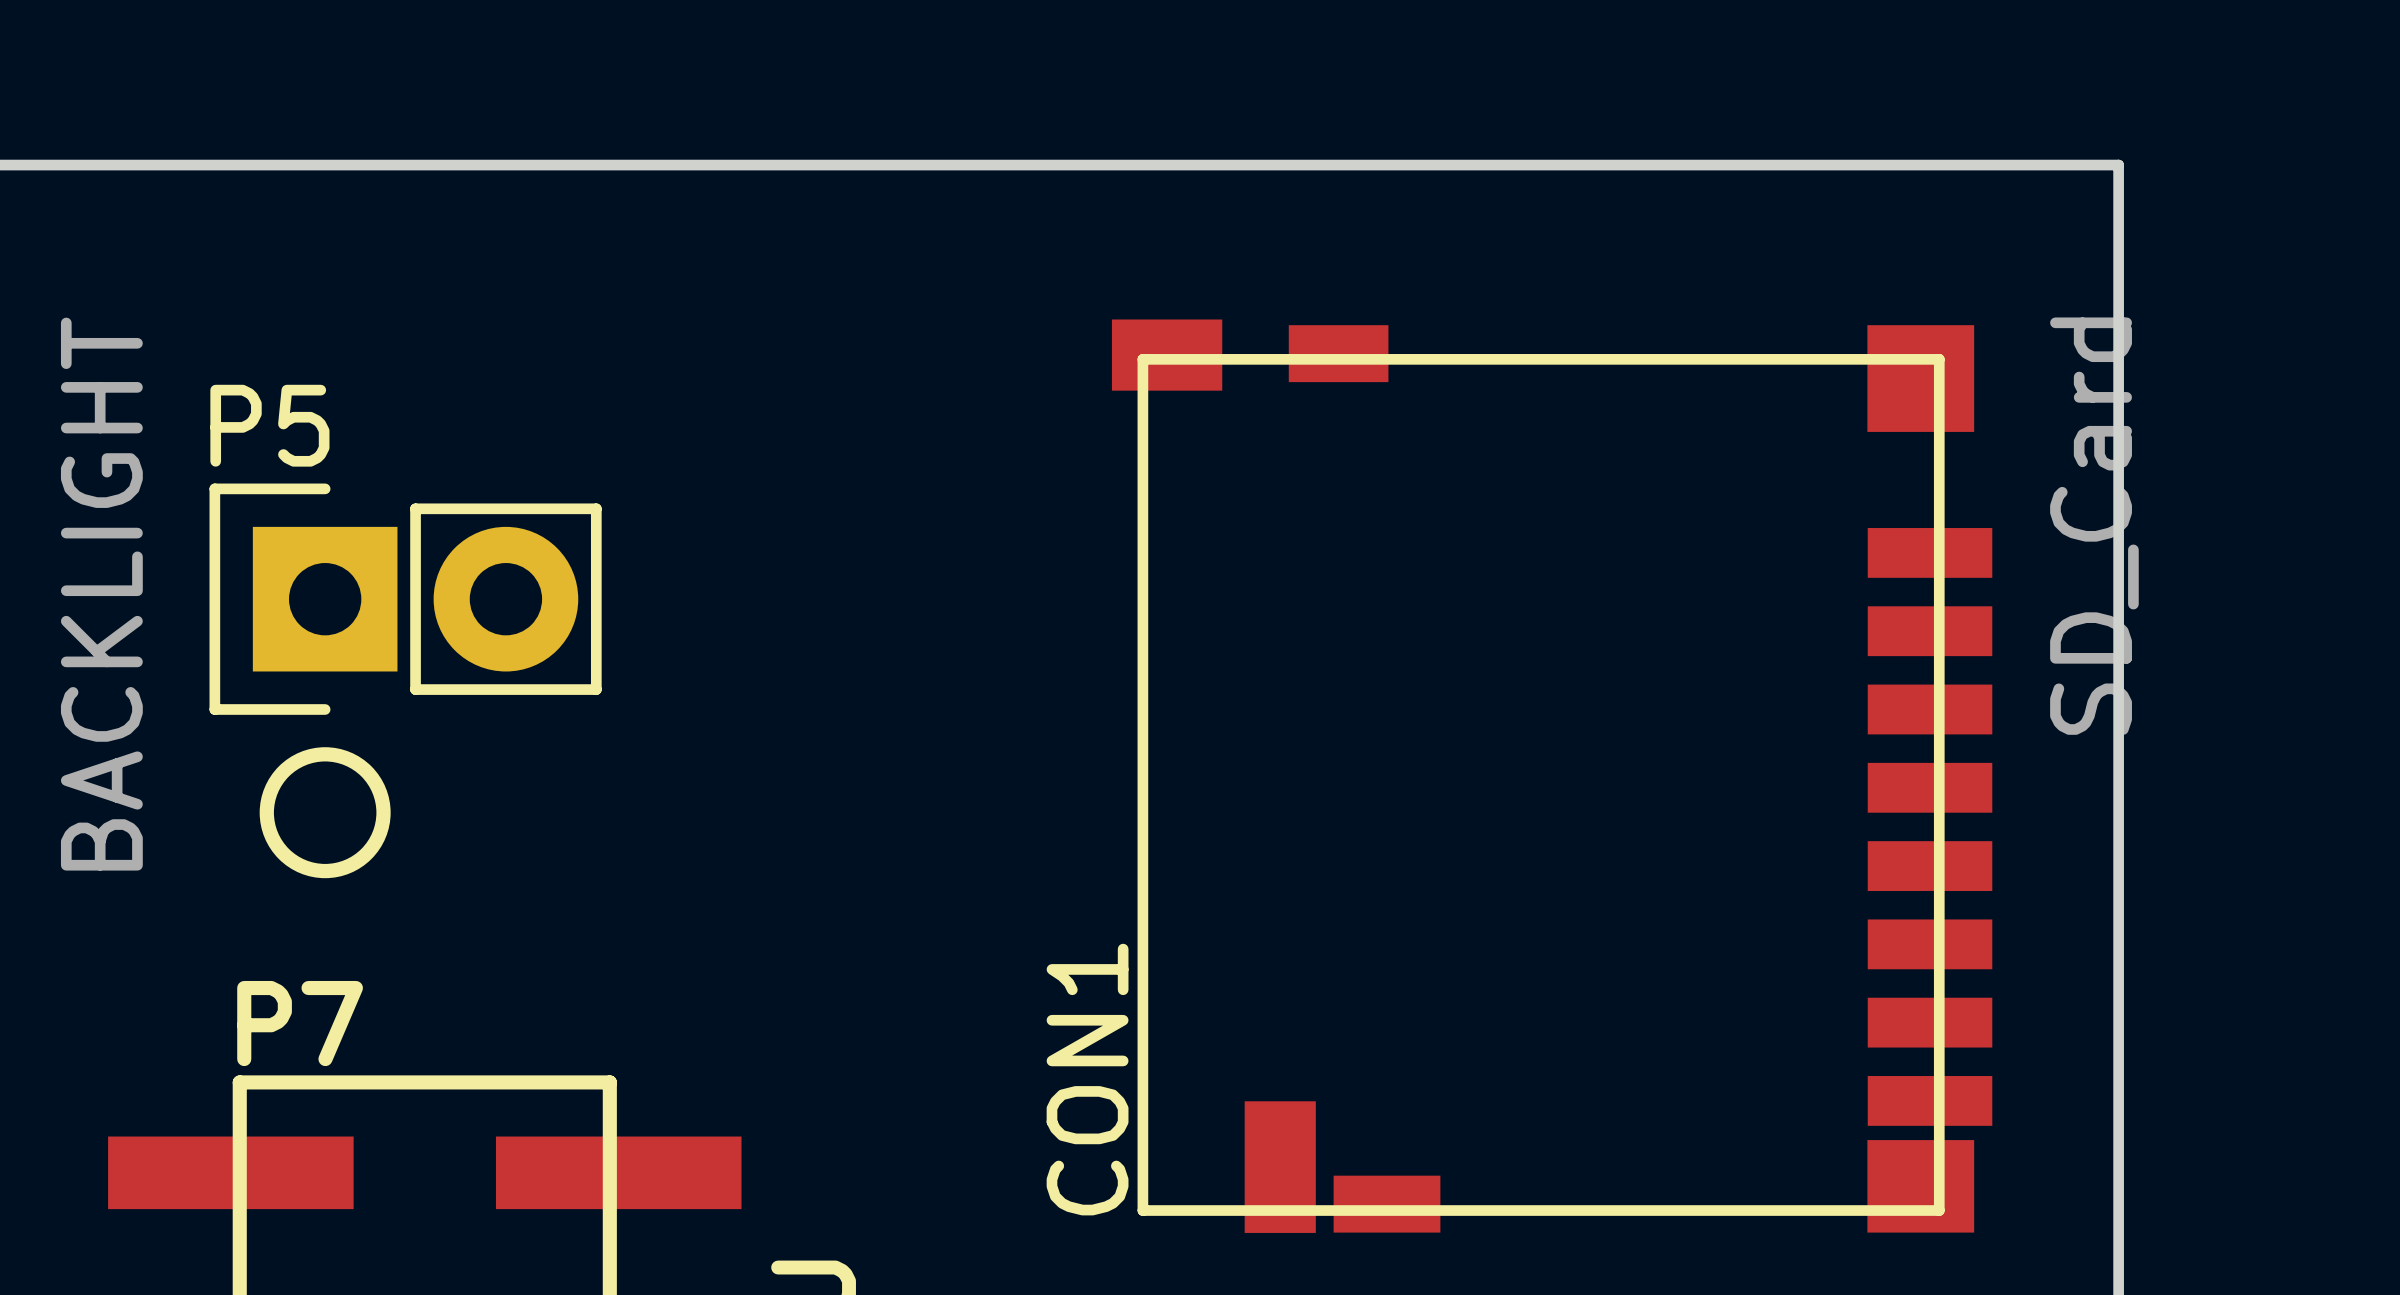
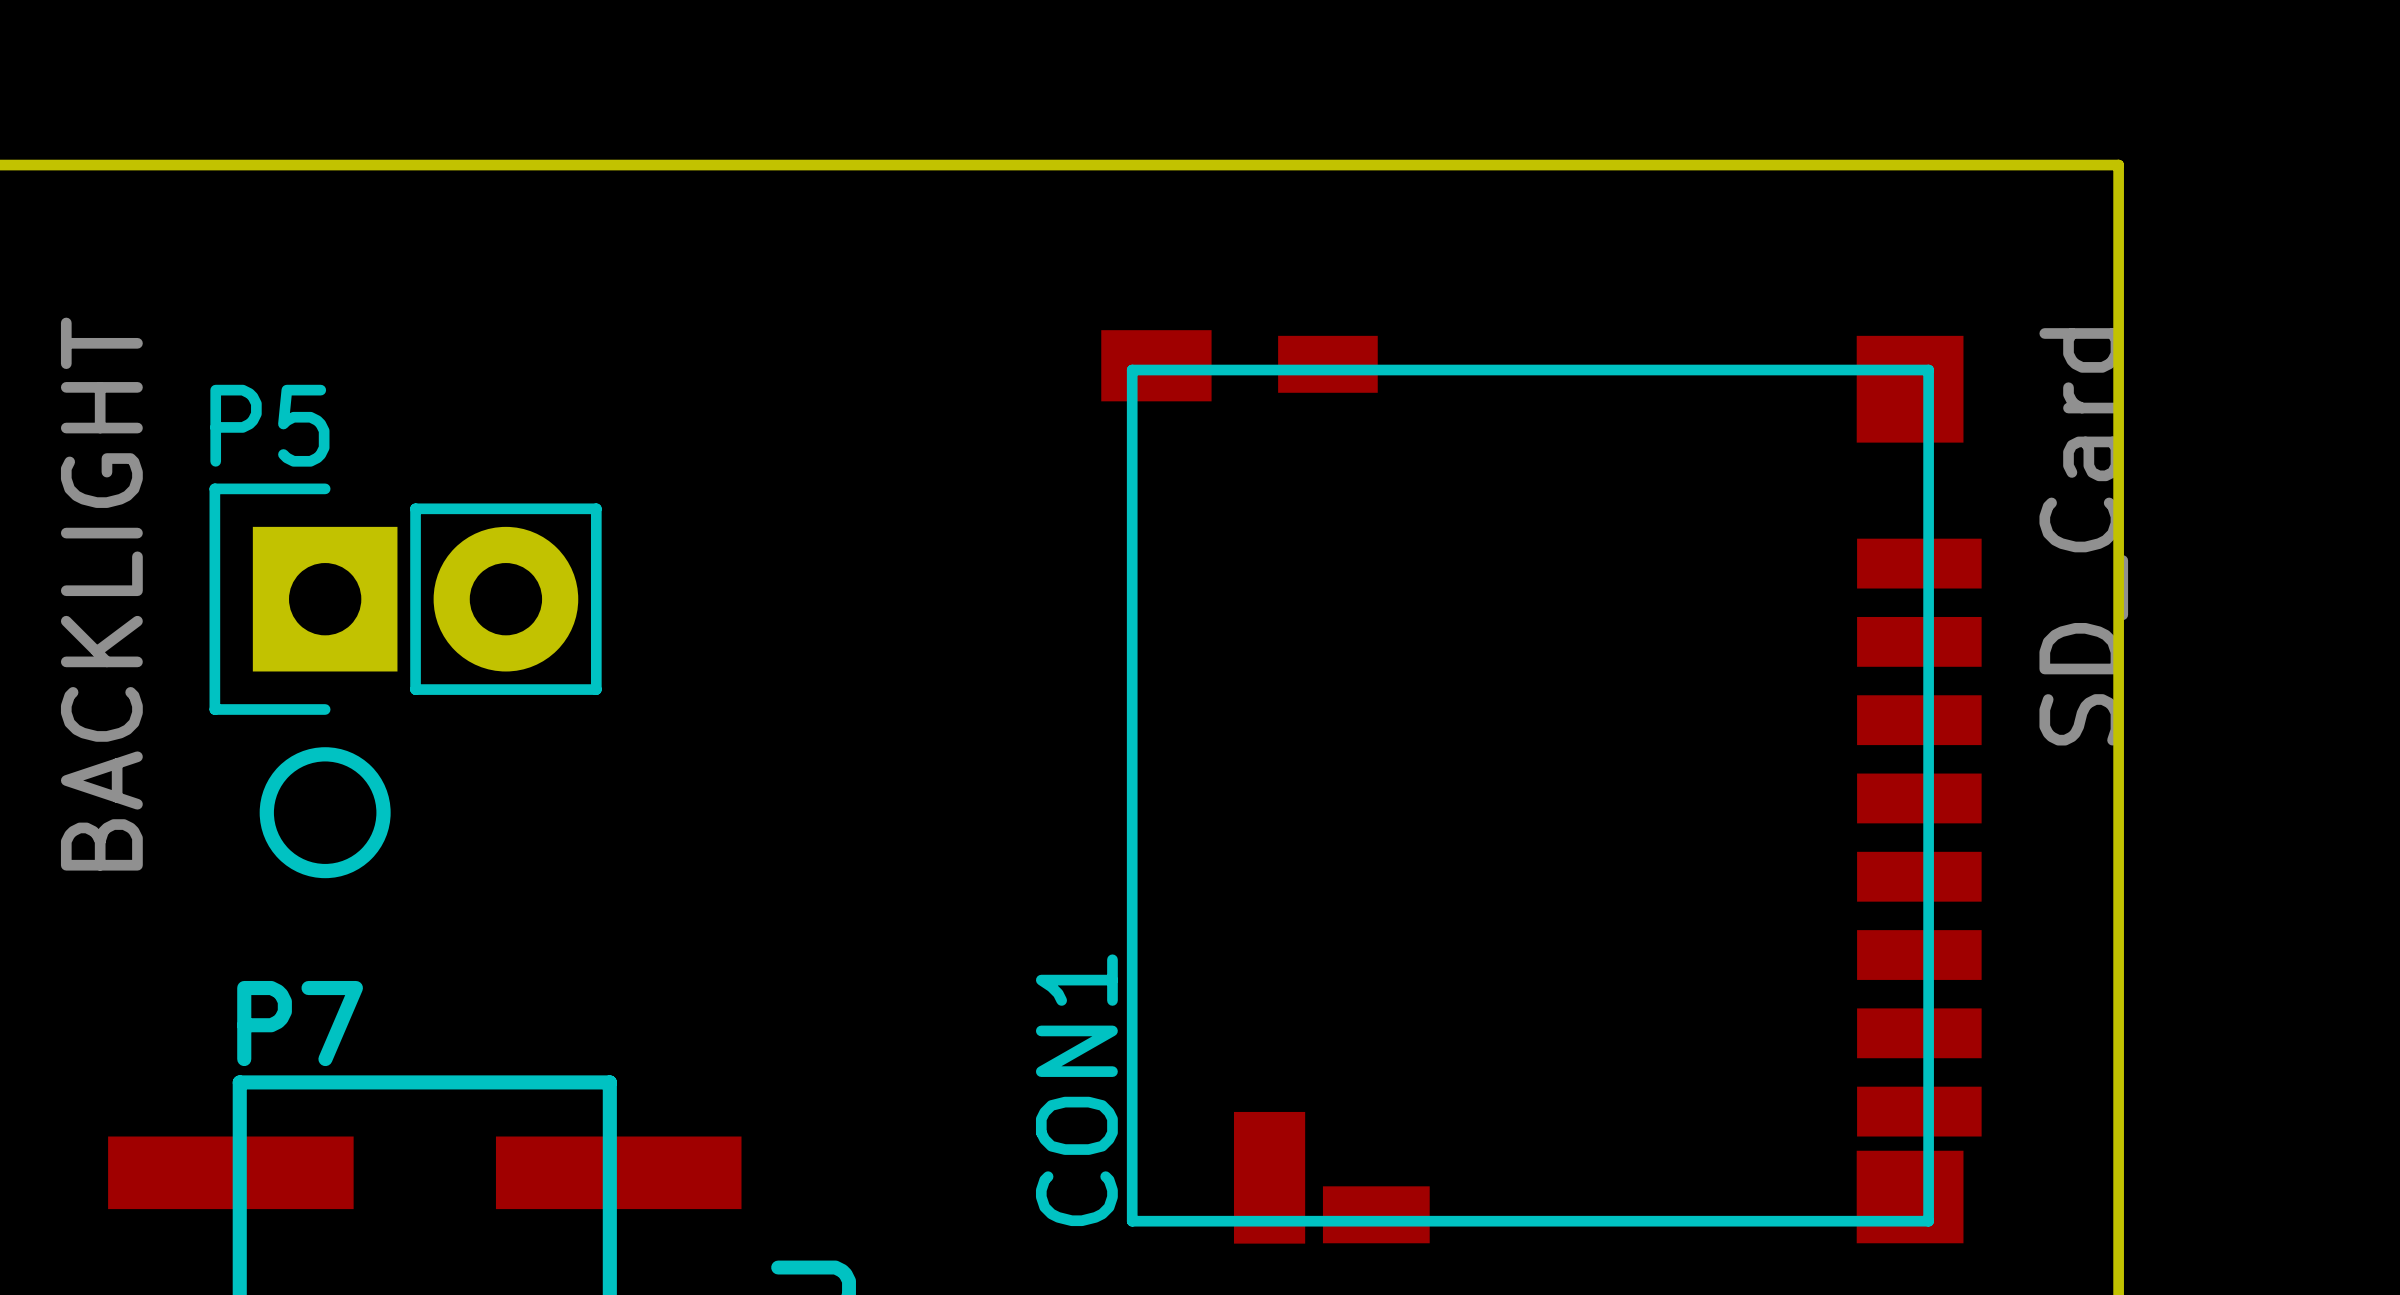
CON1 position: (1552, 776) -> (1541, 786)

